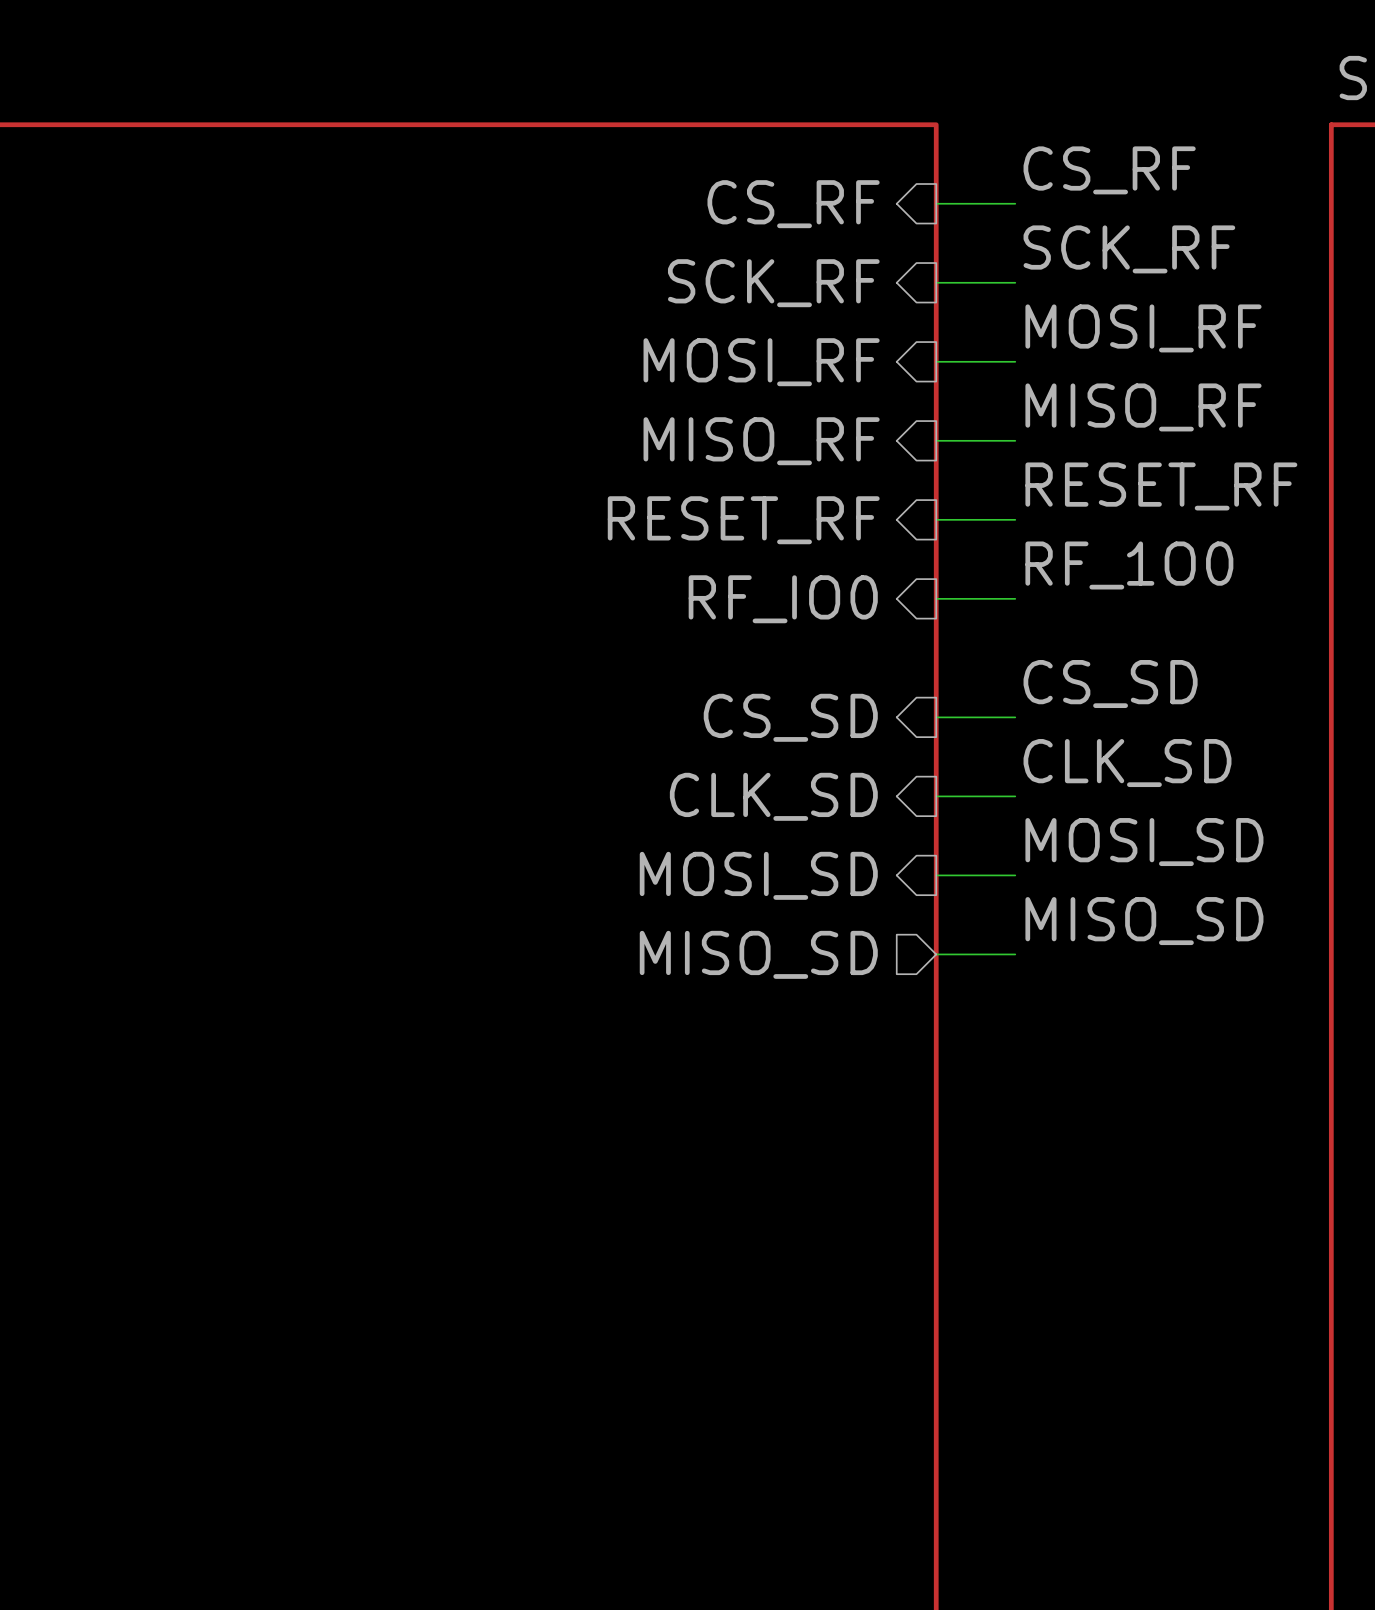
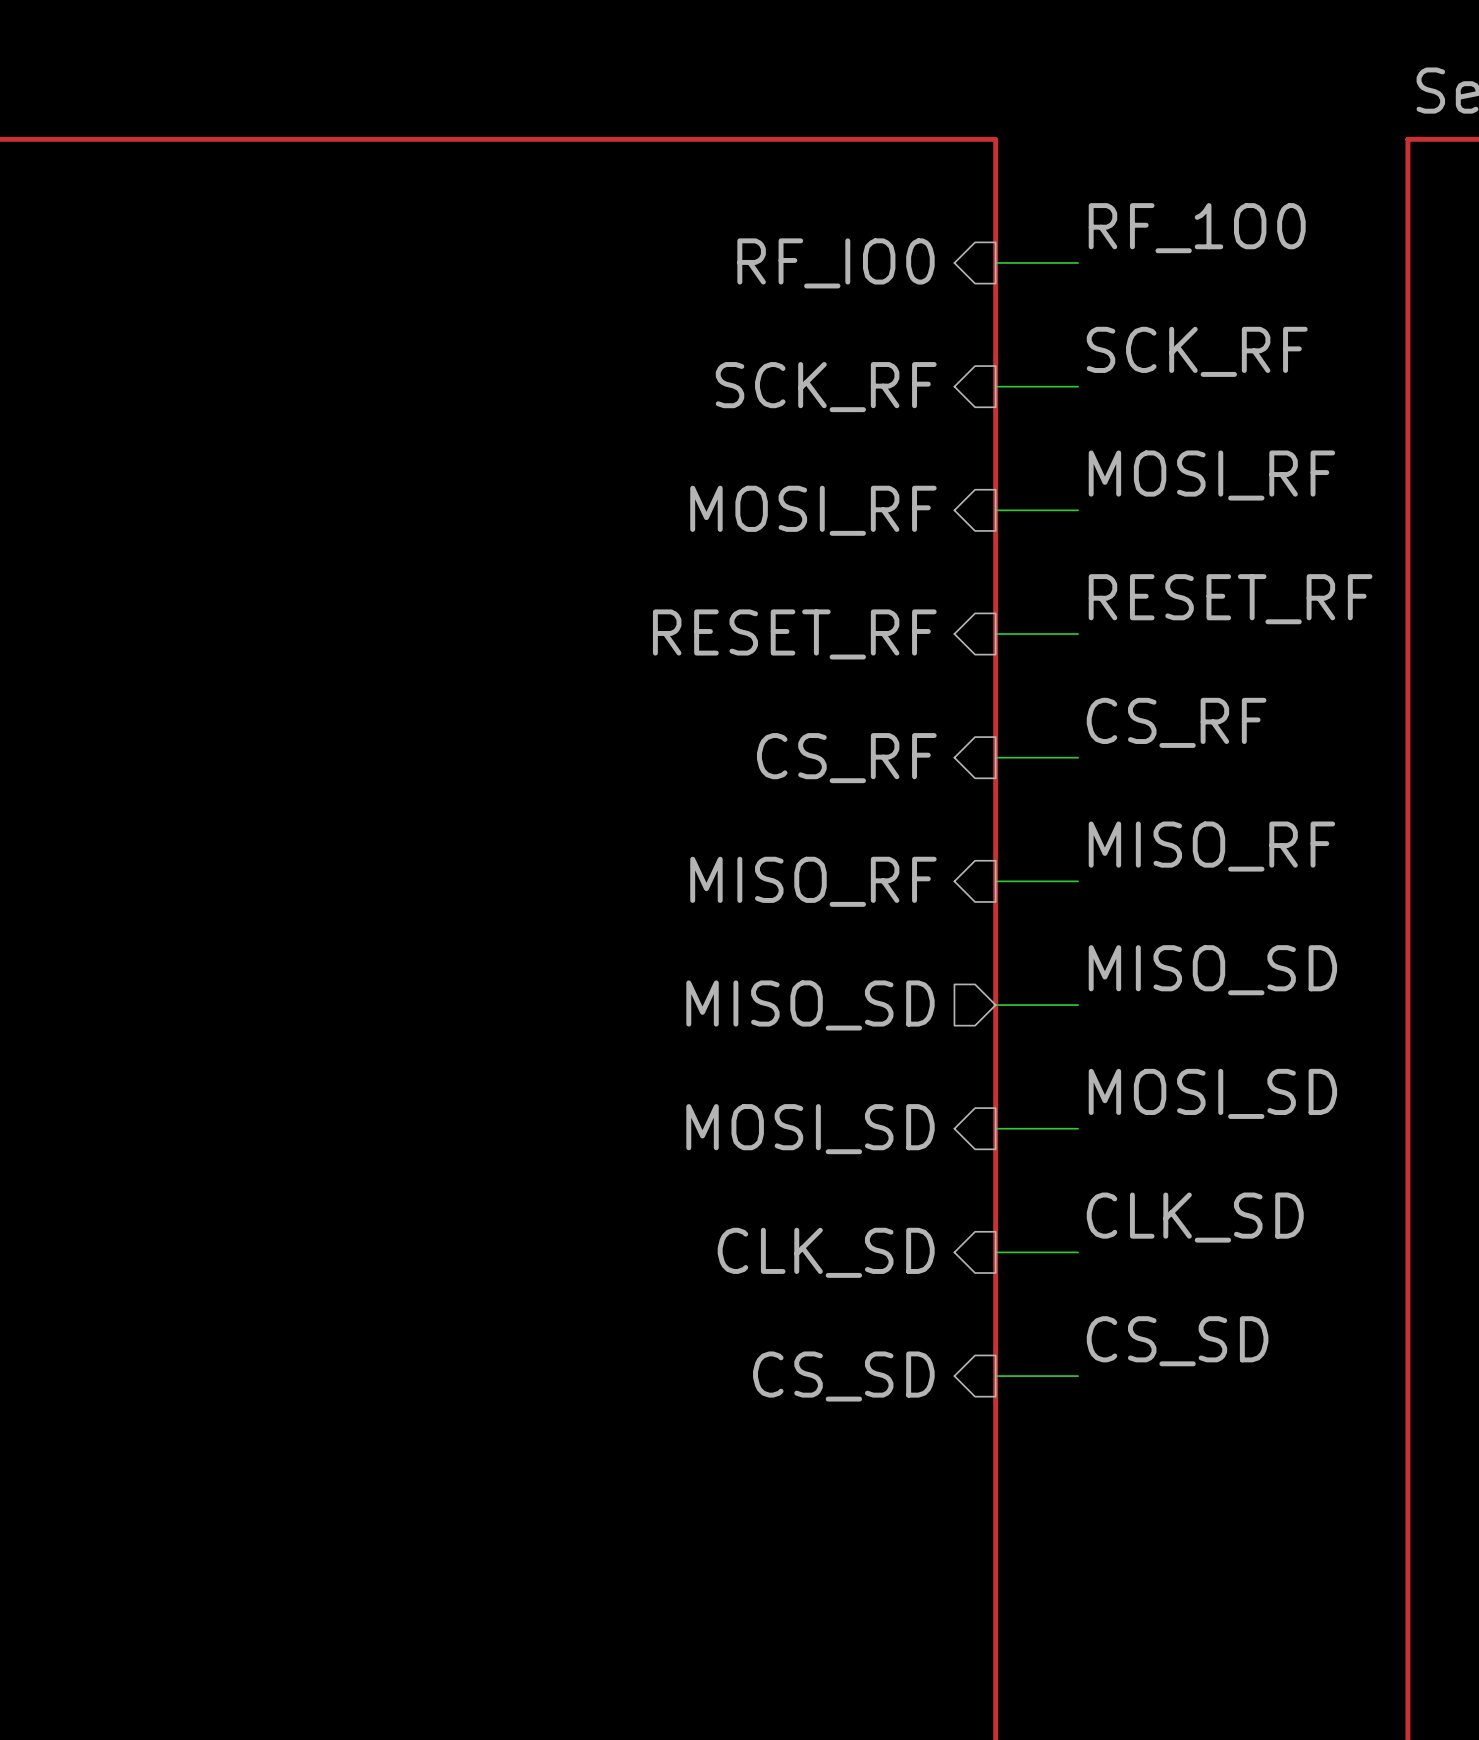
label: CS_RF (1109, 170) -> none
wire: (936, 203) (1015, 203) -> (995, 262) (1078, 262)
sheet pin: CS_RF (793, 204) -> none
label: none -> RF_1O0 (1197, 228)
sheet pin: none -> RF_IO0 (836, 263)
label: SCK_RF (1129, 249) -> none
wire: (936, 282) (1015, 282) -> none
sheet pin: SCK_RF (773, 283) -> none
label: MOSI_RF (1143, 328) -> SCK_RF (1197, 351)
sheet pin: MOSI_RF (761, 362) -> SCK_RF (826, 387)
label position: MISO_RF (1143, 407) -> MISO_RF (1211, 846)
wire: (936, 440) (1015, 440) -> (995, 510) (1078, 510)
sheet pin position: MISO_RF (761, 441) -> MISO_RF (813, 881)
label: none -> MOSI_RF (1211, 475)
sheet pin: none -> MOSI_RF (813, 510)
label: RESET_RF (1161, 486) -> none
wire: (936, 519) (1015, 519) -> (995, 1252) (1078, 1252)
sheet pin: RESET_RF (743, 520) -> none
label: RF_1O0 (1129, 565) -> RESET_RF (1230, 599)
sheet pin: RF_IO0 (783, 599) -> RESET_RF (794, 634)
label: CS_SD (1110, 684) -> CS_RF (1176, 722)
sheet pin: CS_SD (790, 717) -> CS_RF (846, 758)
label position: CLK_SD (1127, 763) -> CLK_SD (1195, 1217)
sheet pin position: CLK_SD (773, 796) -> CLK_SD (826, 1252)
wire: (936, 796) (1015, 796) -> (995, 881) (1078, 881)
label position: MOSI_SD (1144, 842) -> MOSI_SD (1212, 1093)
sheet pin position: MOSI_SD (758, 875) -> MOSI_SD (810, 1129)
wire: (936, 875) (1015, 875) -> (995, 1128) (1078, 1128)
label: none -> CS_SD (1177, 1341)
sheet pin: none -> CS_SD (843, 1376)
wire: none -> (995, 1376) (1078, 1376)

